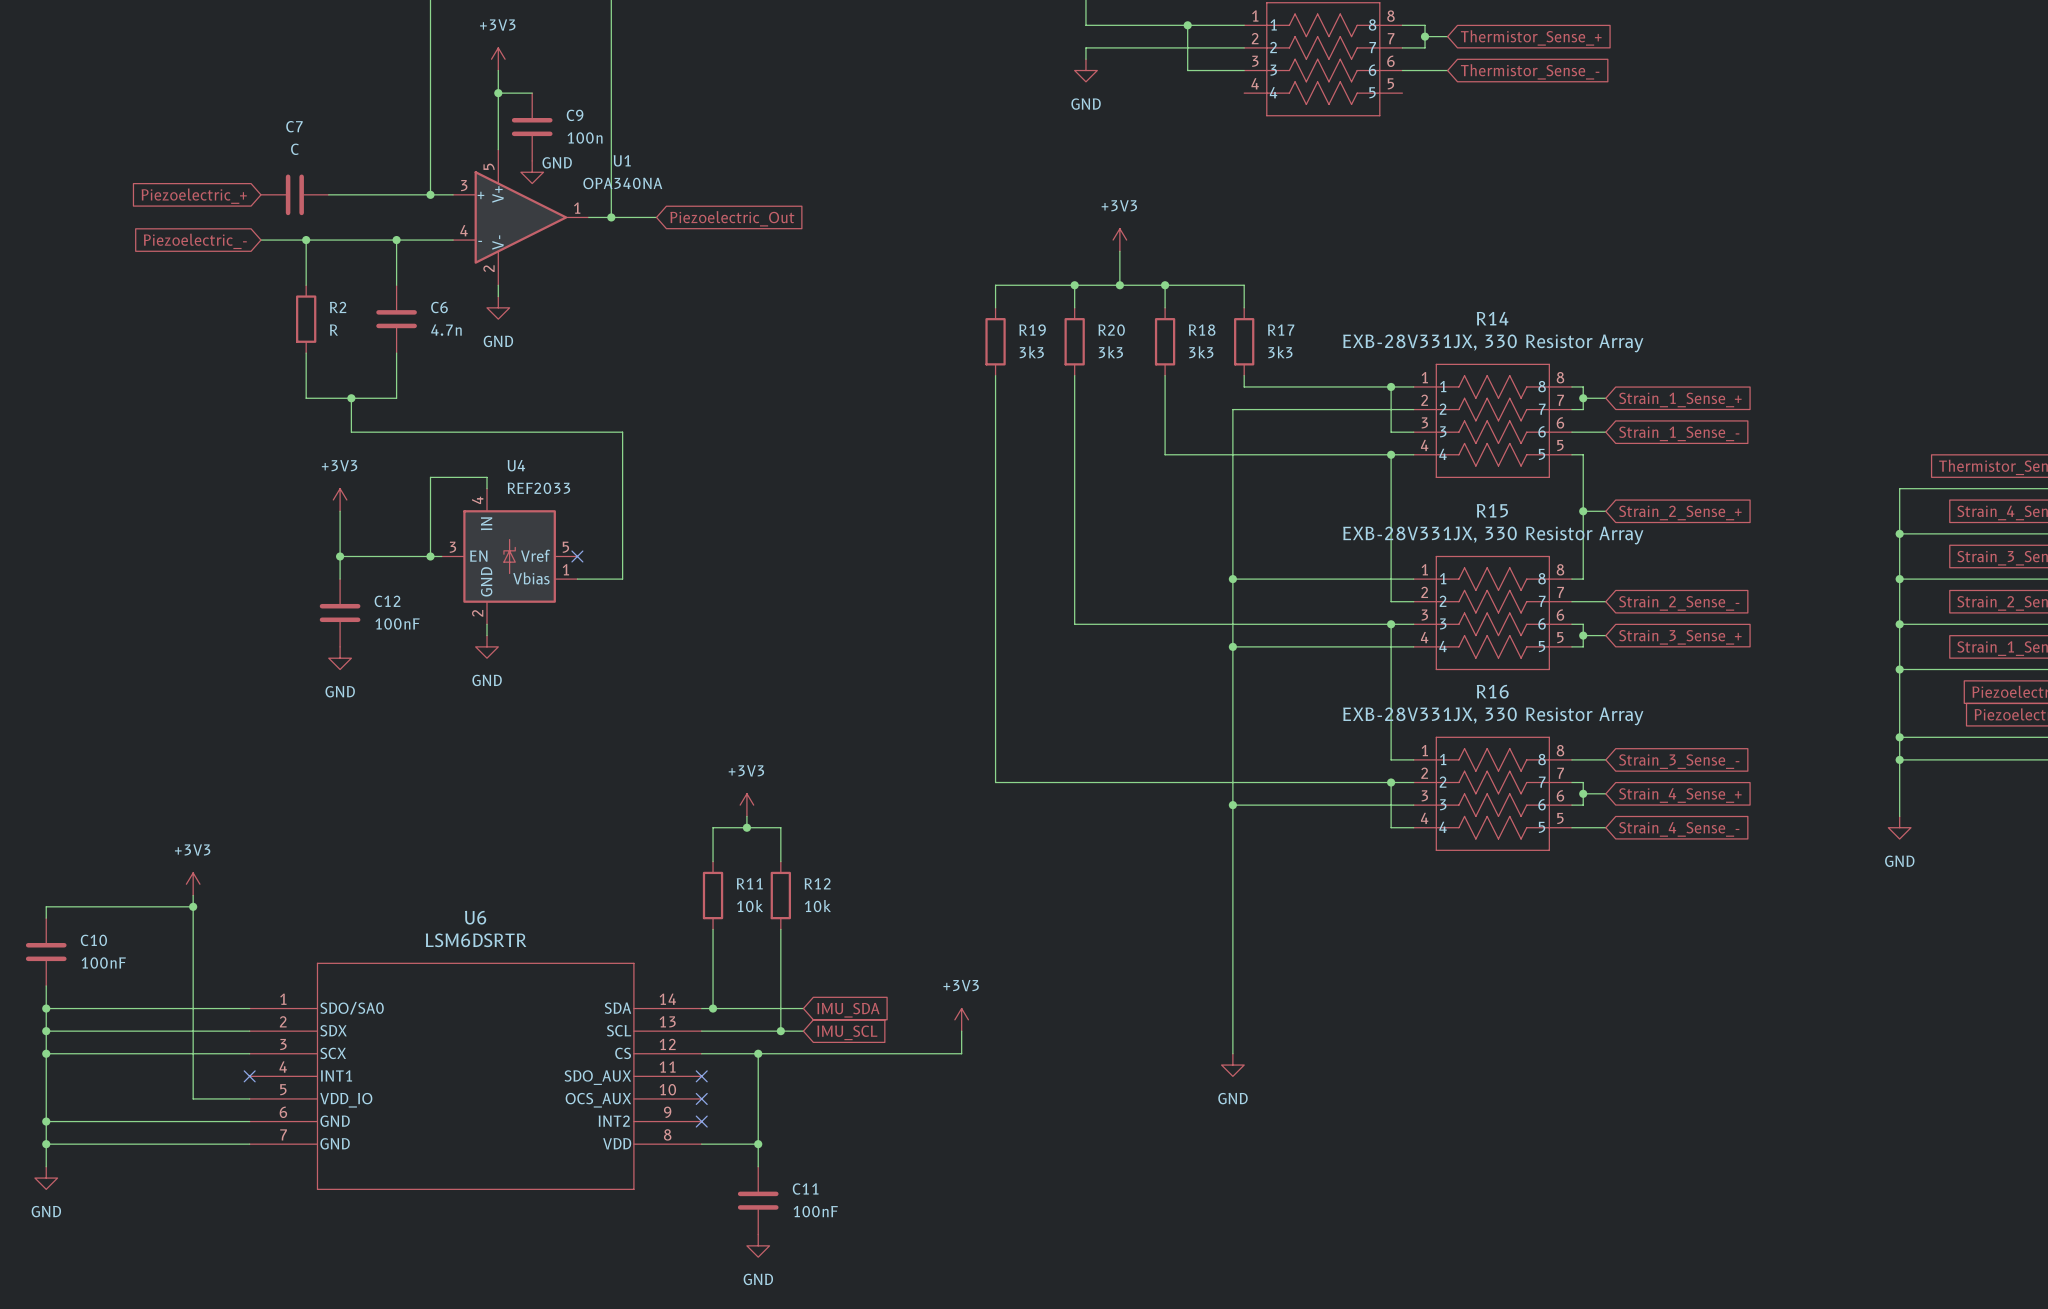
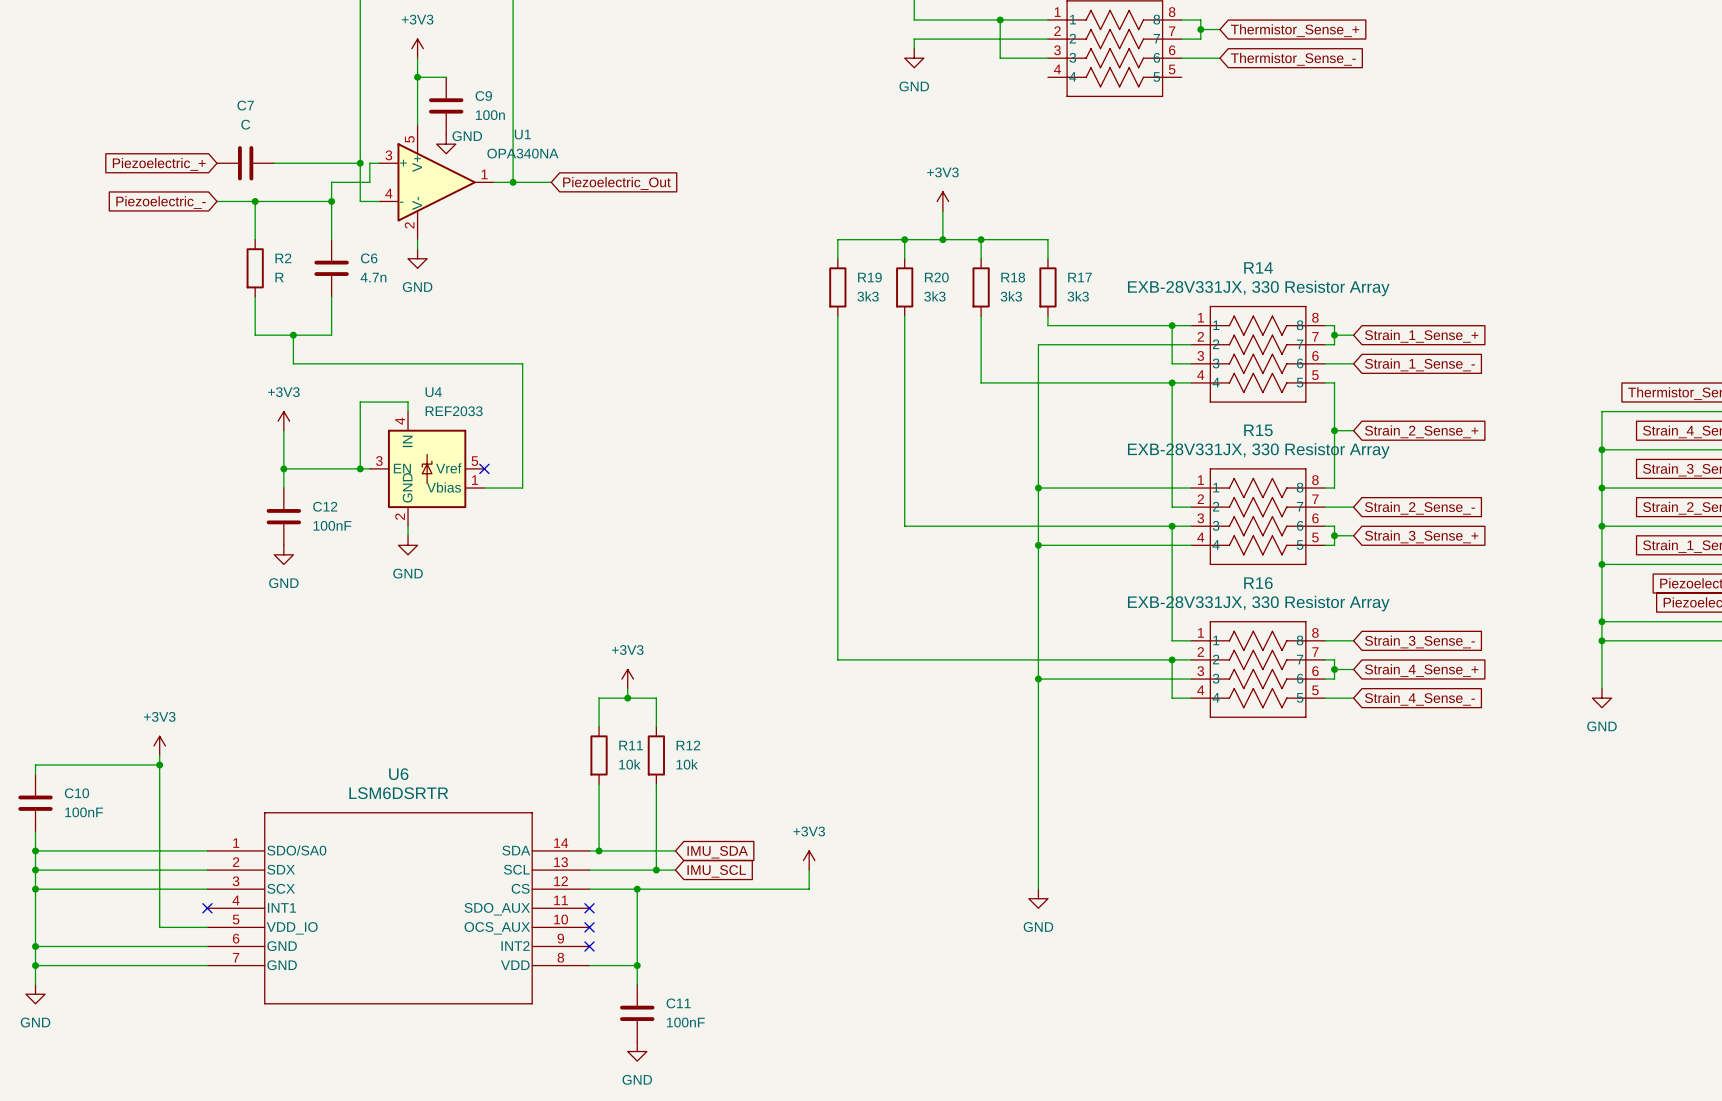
wire: (430, 194) (441, 194) -> (360, 163) (360, 201)
wire: (396, 240) (430, 240) -> (331, 201) (331, 182) (369, 182) (369, 163)

